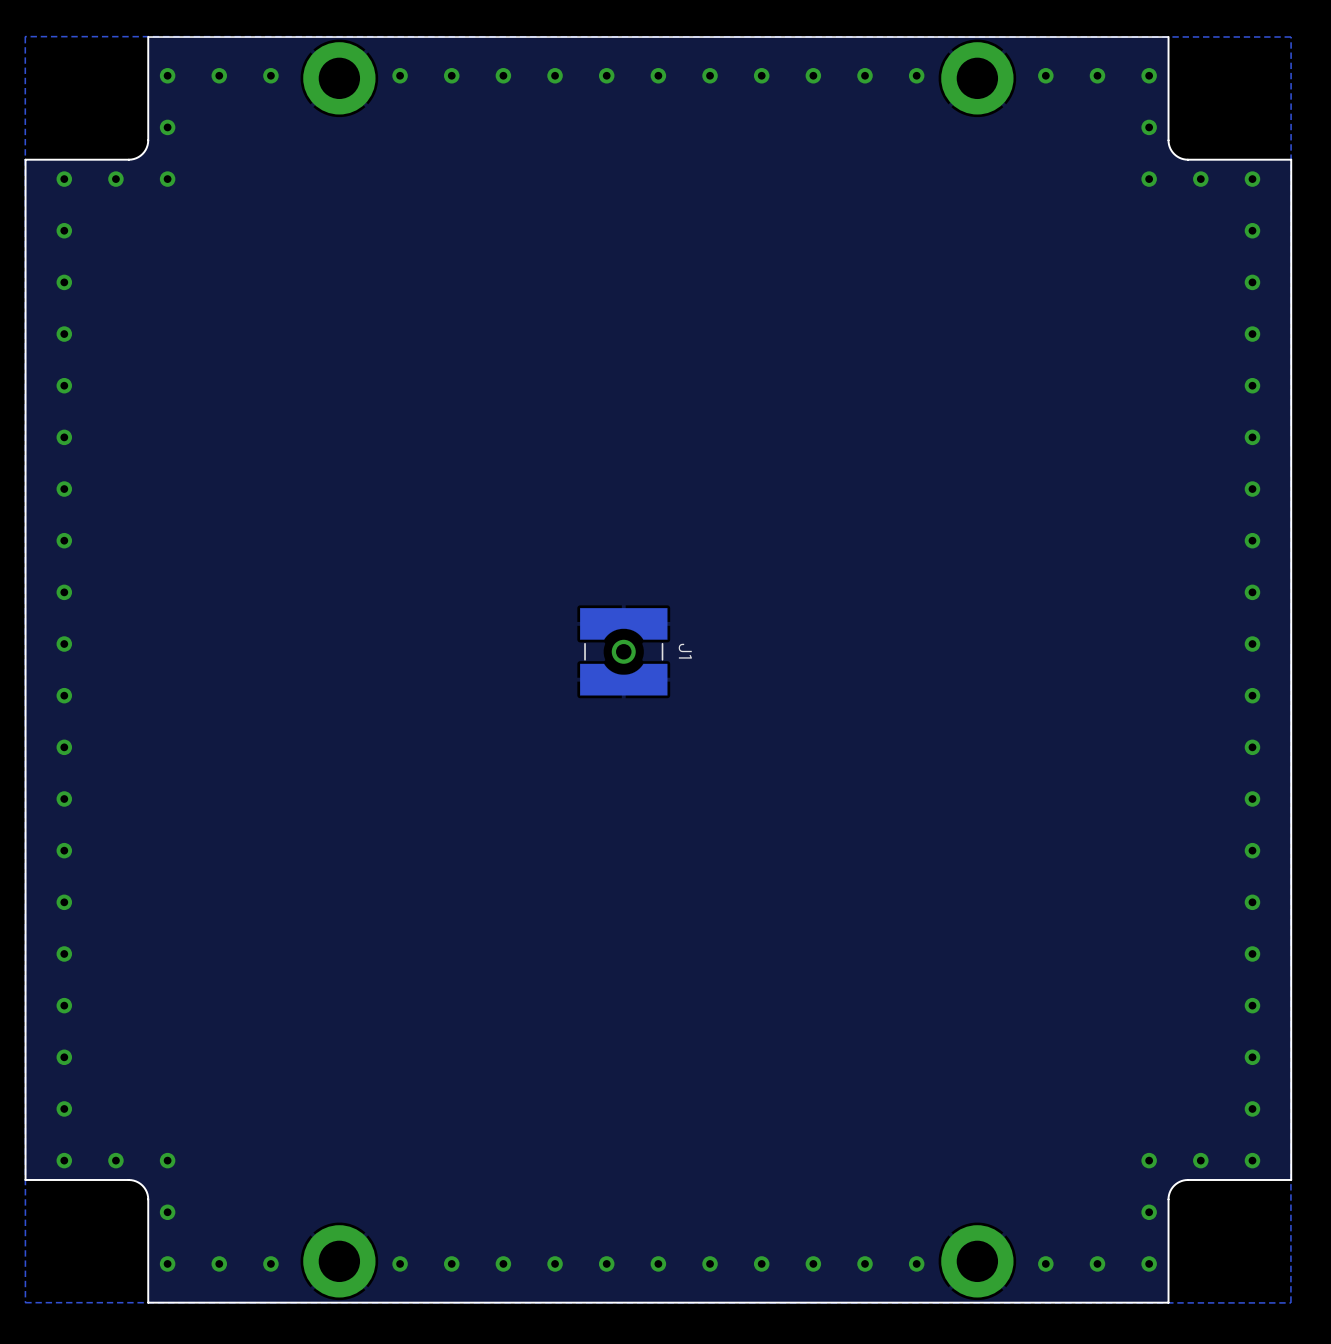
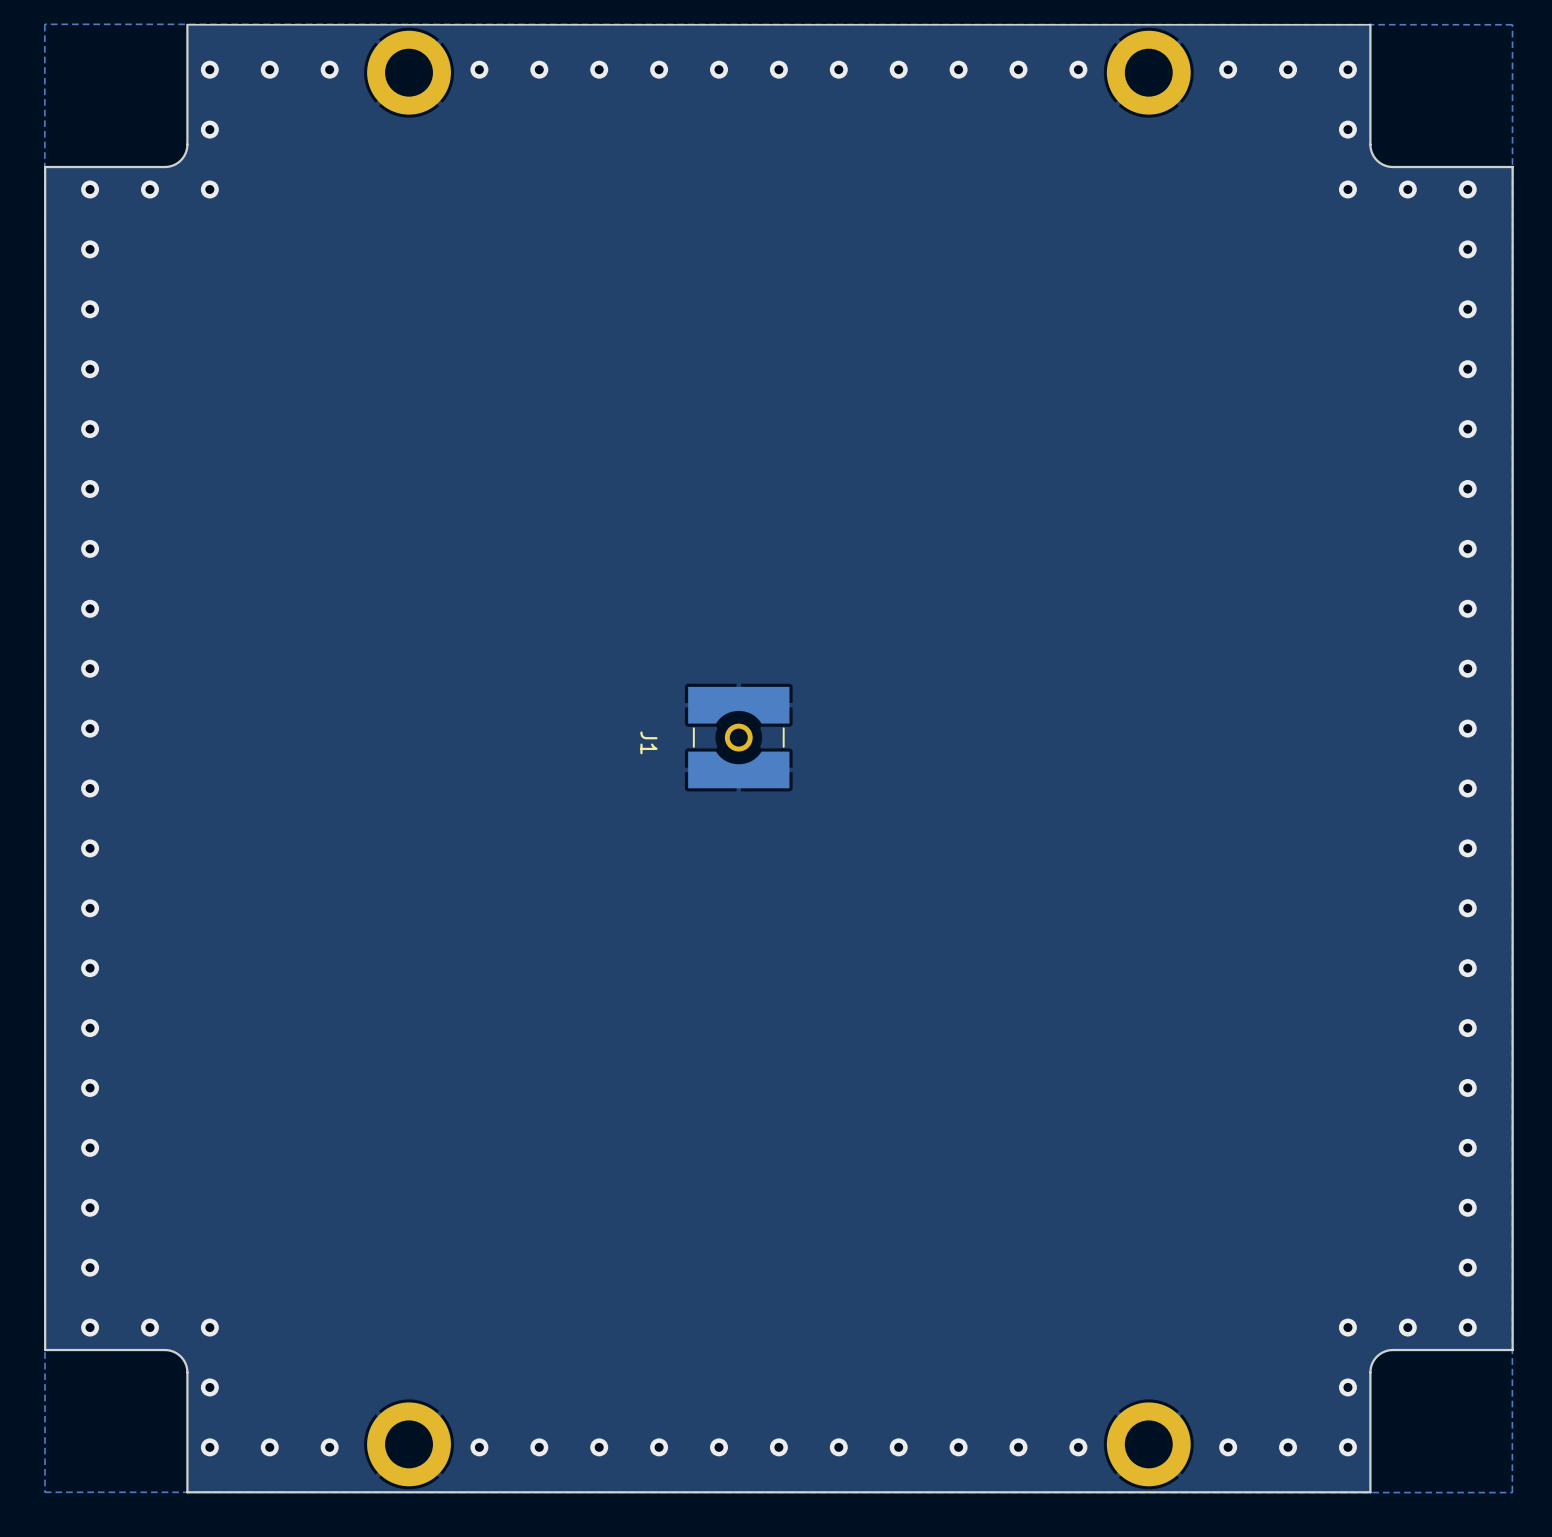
J1 name position: J1 (685, 651) -> J1 (648, 742)

